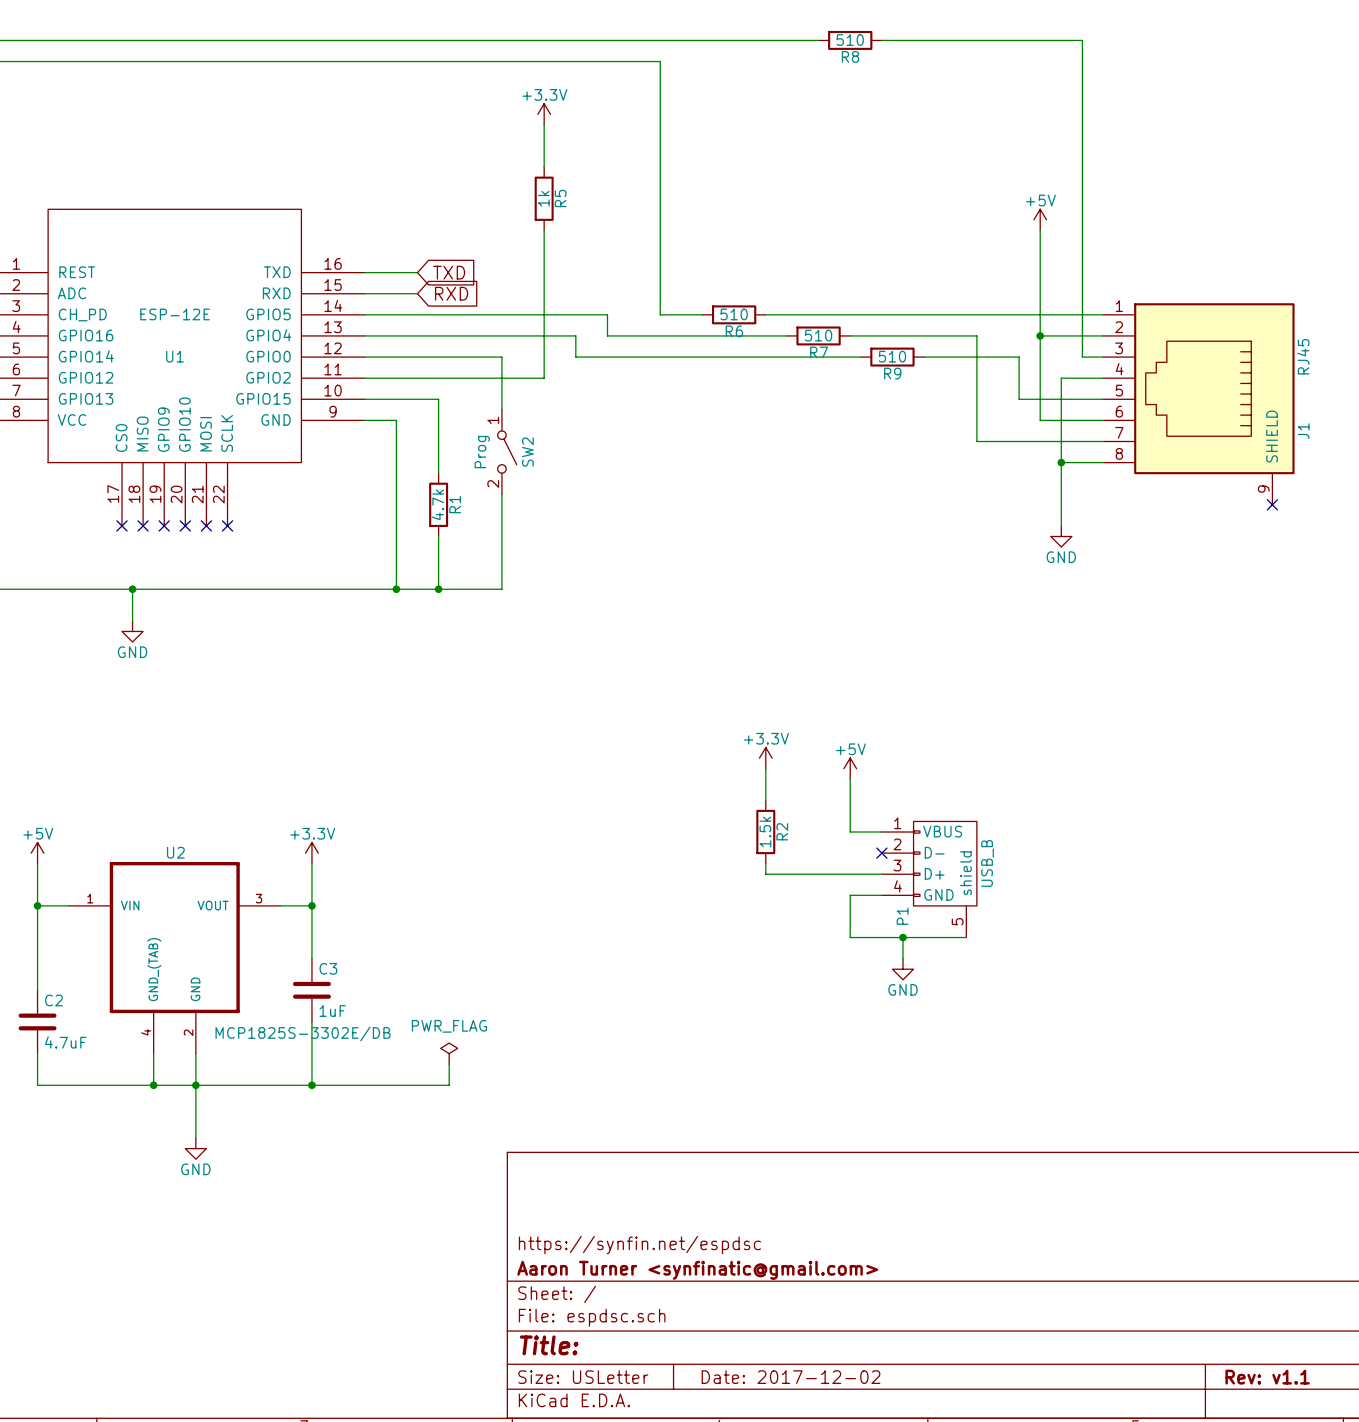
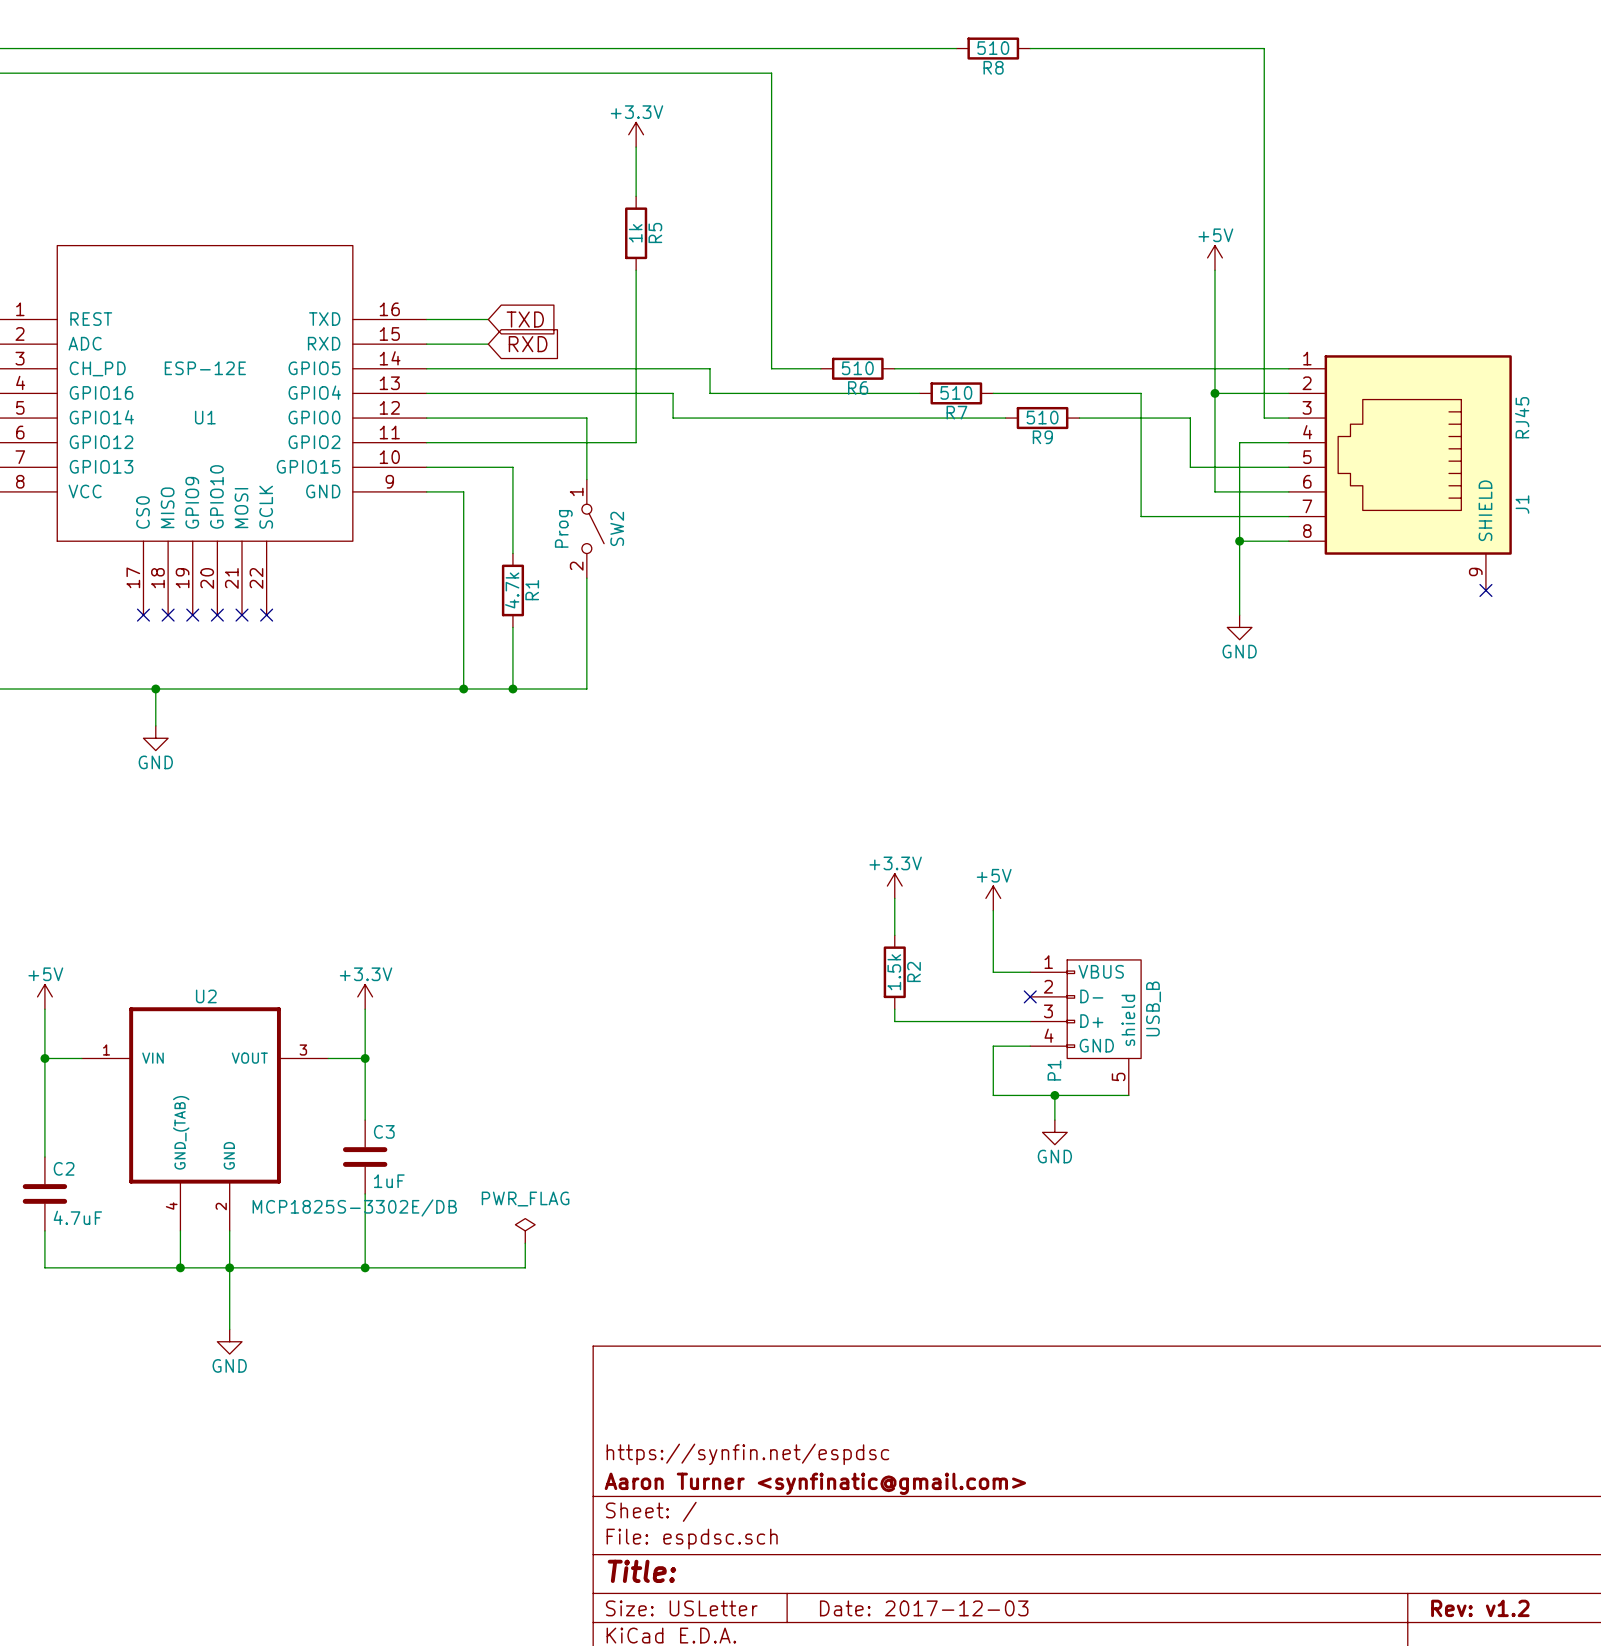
title block: Date: 2017-12-02 (791, 1377) -> Date: 2017-12-03 (924, 1608)
title block: Rev: v1.1 (1267, 1377) -> Rev: v1.2 (1480, 1608)

